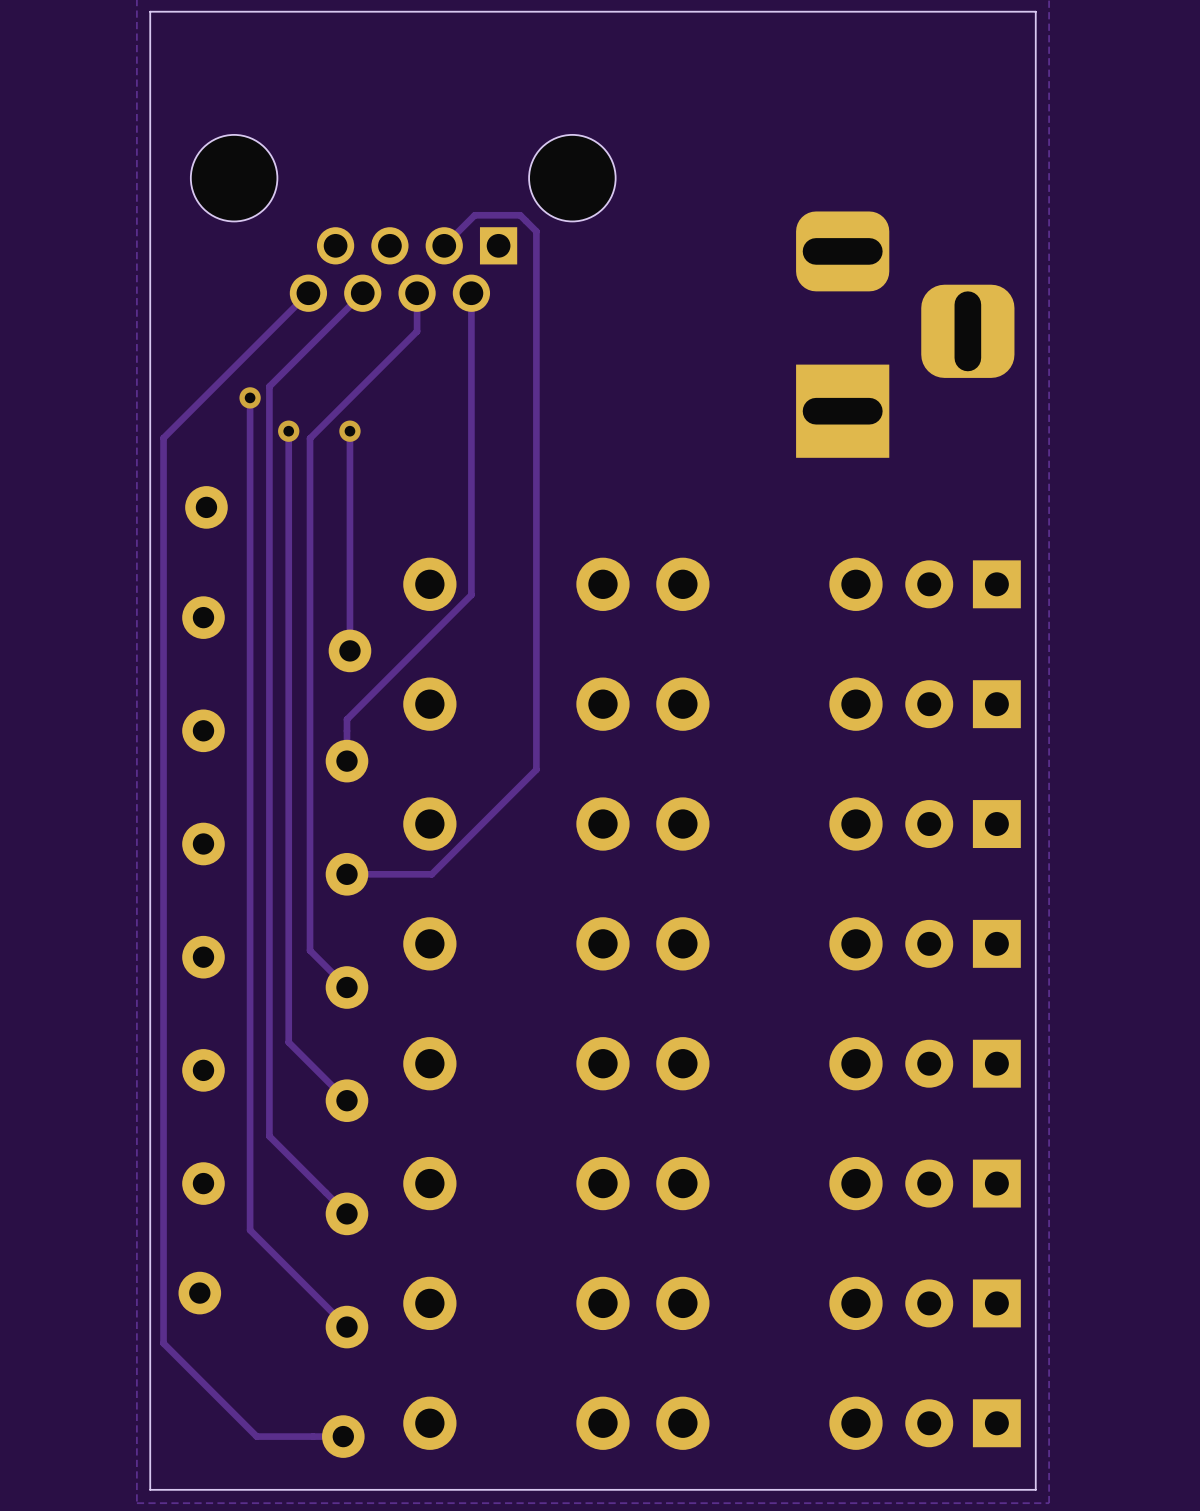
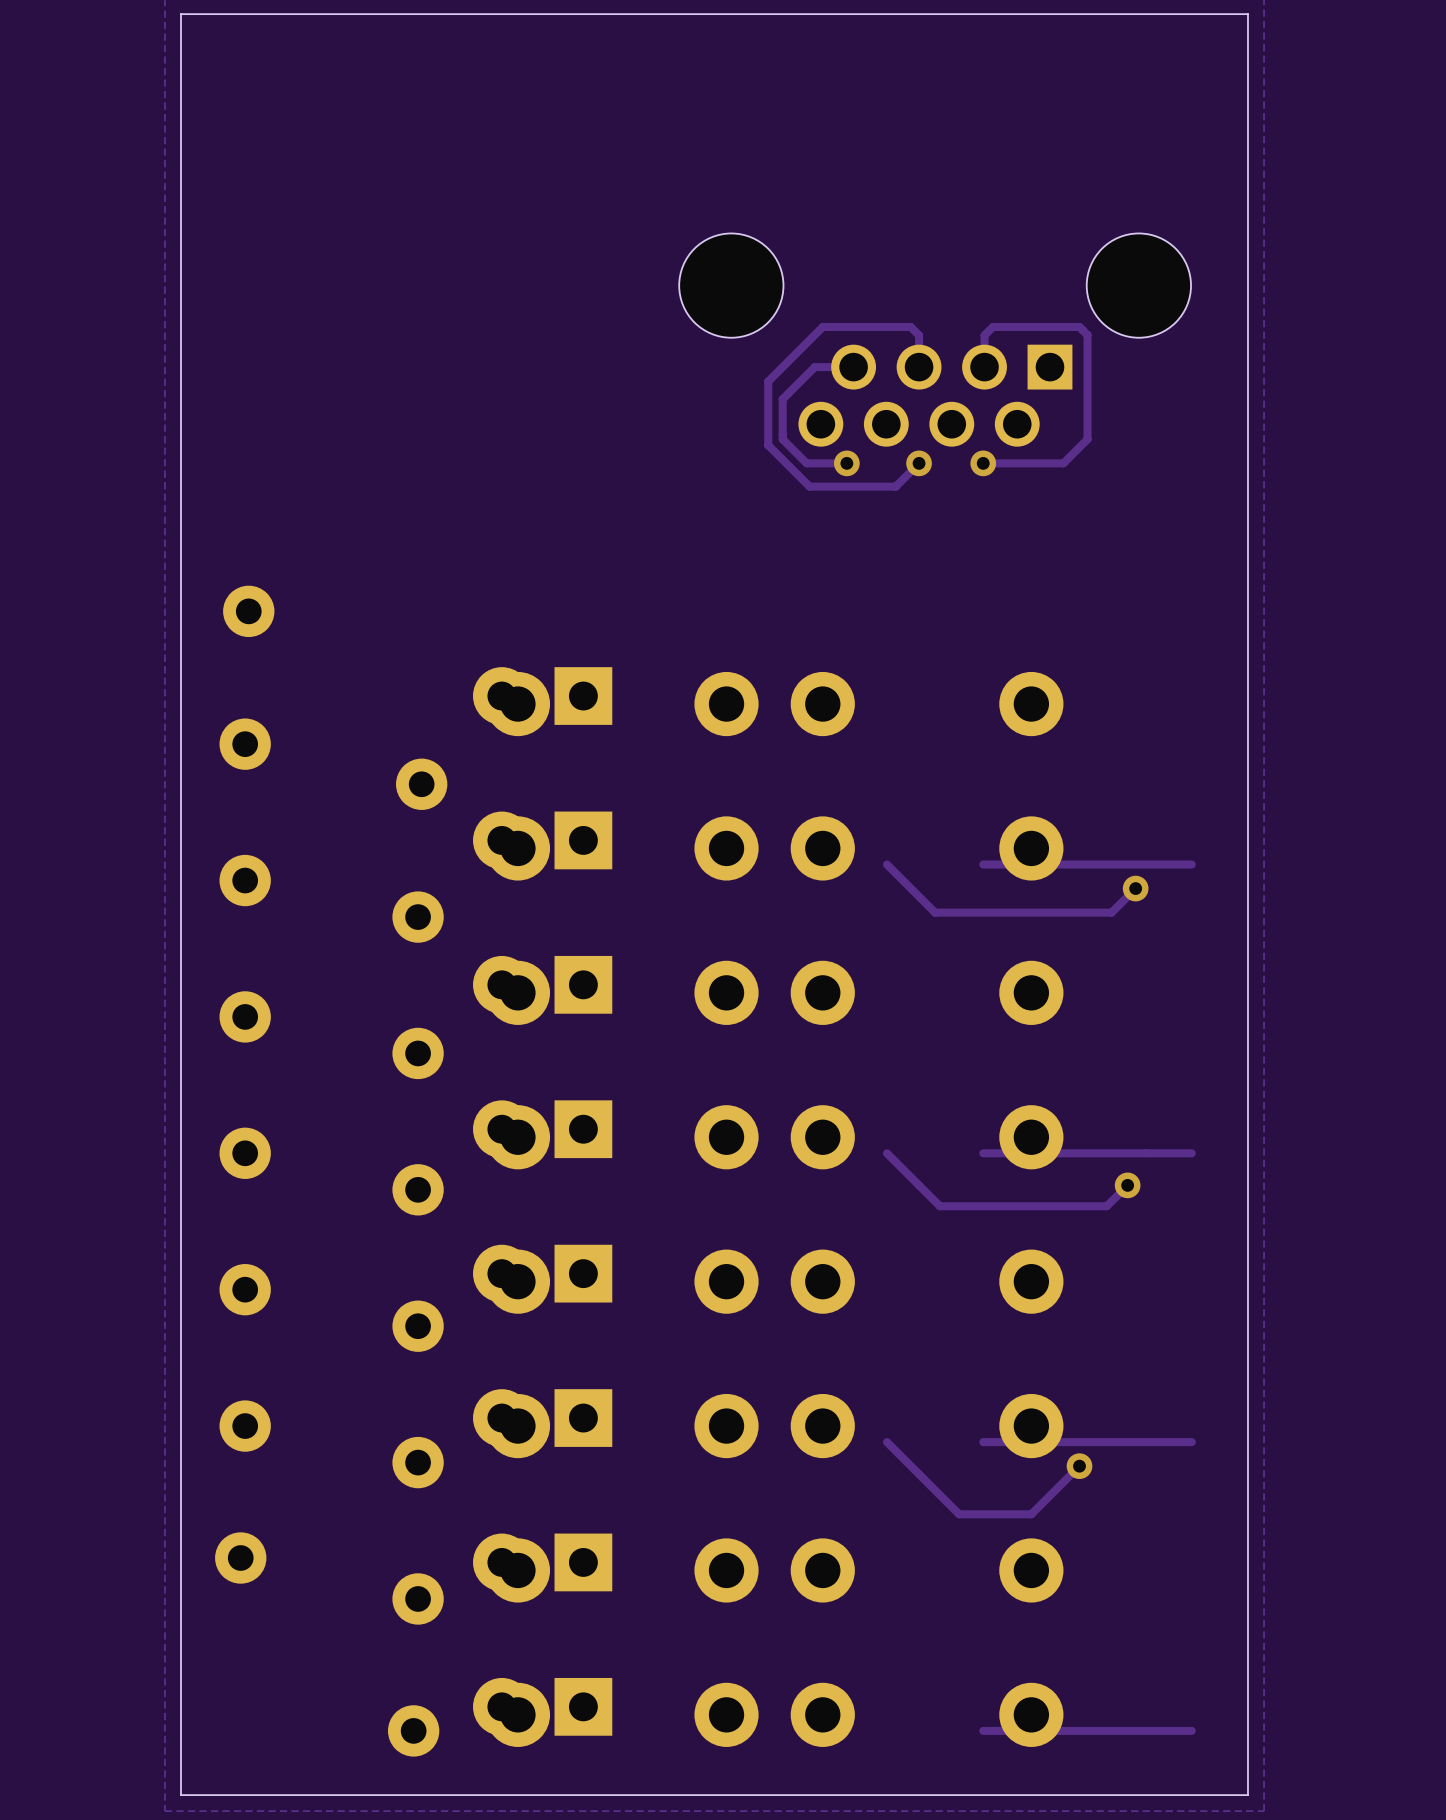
part position: (403, 223) -> (935, 340)
track: (444, 245) (474, 215) (520, 215) (536, 231) (536, 769) (431, 874) (346, 874) -> none
track: (308, 293) (163, 438) (163, 1343) (256, 1436) (343, 1436) -> none
track: (362, 293) (269, 386) (269, 1136) (346, 1213) -> none
track: (417, 293) (417, 331) (310, 438) (310, 950) (346, 987) -> none
track: (471, 293) (471, 595) (346, 719) (346, 761) -> none
track: none -> (853, 367) (814, 367) (782, 399) (782, 439) (806, 463) (846, 463)
track: none -> (919, 367) (919, 335) (910, 326) (822, 326) (768, 381) (768, 445) (809, 486) (895, 486) (919, 463)
track: none -> (984, 367) (984, 335) (992, 326) (1079, 326) (1087, 335) (1087, 439) (1063, 463) (983, 463)
part: (905, 334) -> none
via: none -> (846, 463)
via: none -> (919, 463)
via: none -> (983, 463)
track: (250, 397) (250, 1230) (346, 1327) -> none
via: (250, 397) -> none
track: (288, 431) (288, 1042) (346, 1100) -> none
via: (288, 431) -> none
track: (349, 431) (349, 650) -> none
via: (349, 431) -> none
part: none -> (542, 696)
part: (963, 584) -> none
part: none -> (542, 840)
part: (963, 704) -> none
track: none -> (886, 864) (935, 912) (1111, 912) (1135, 888)
track: none -> (1191, 864) (983, 864)
via: none -> (1135, 888)
part: none -> (542, 984)
part: (963, 824) -> none
part: none -> (542, 1129)
part: (963, 943) -> none
track: none -> (886, 1153) (939, 1206) (1106, 1206) (1127, 1185)
track: none -> (1191, 1153) (983, 1153)
via: none -> (1127, 1185)
part: none -> (542, 1273)
part: (963, 1063) -> none
part: none -> (542, 1418)
part: (963, 1183) -> none
track: none -> (886, 1442) (959, 1514) (1031, 1514) (1079, 1466)
track: none -> (1191, 1442) (983, 1442)
via: none -> (1079, 1466)
part: none -> (542, 1562)
part: (963, 1303) -> none
part: none -> (542, 1706)
part: (963, 1423) -> none
track: none -> (1191, 1730) (983, 1730)

